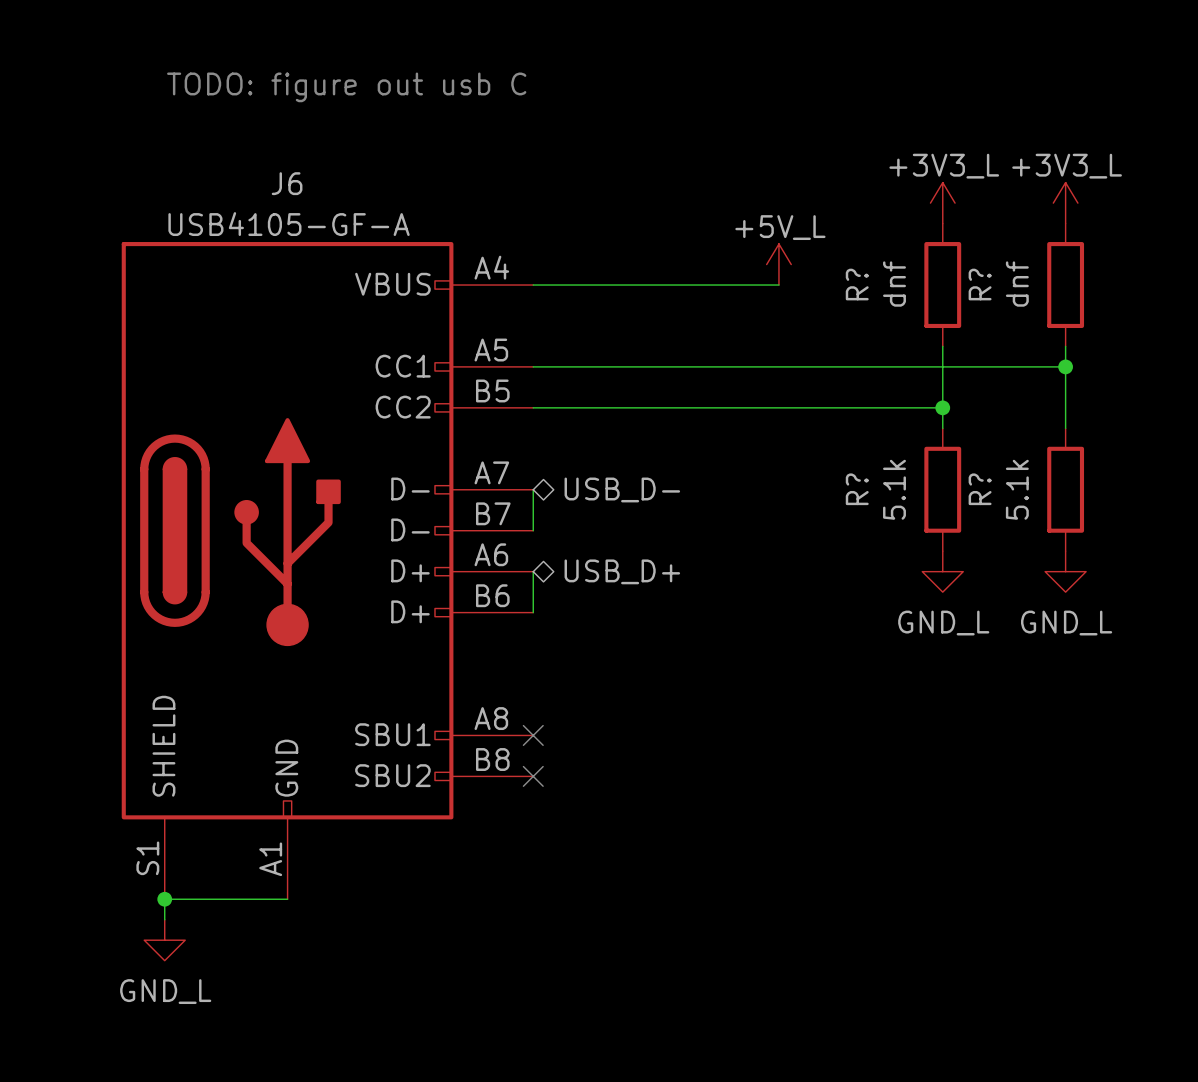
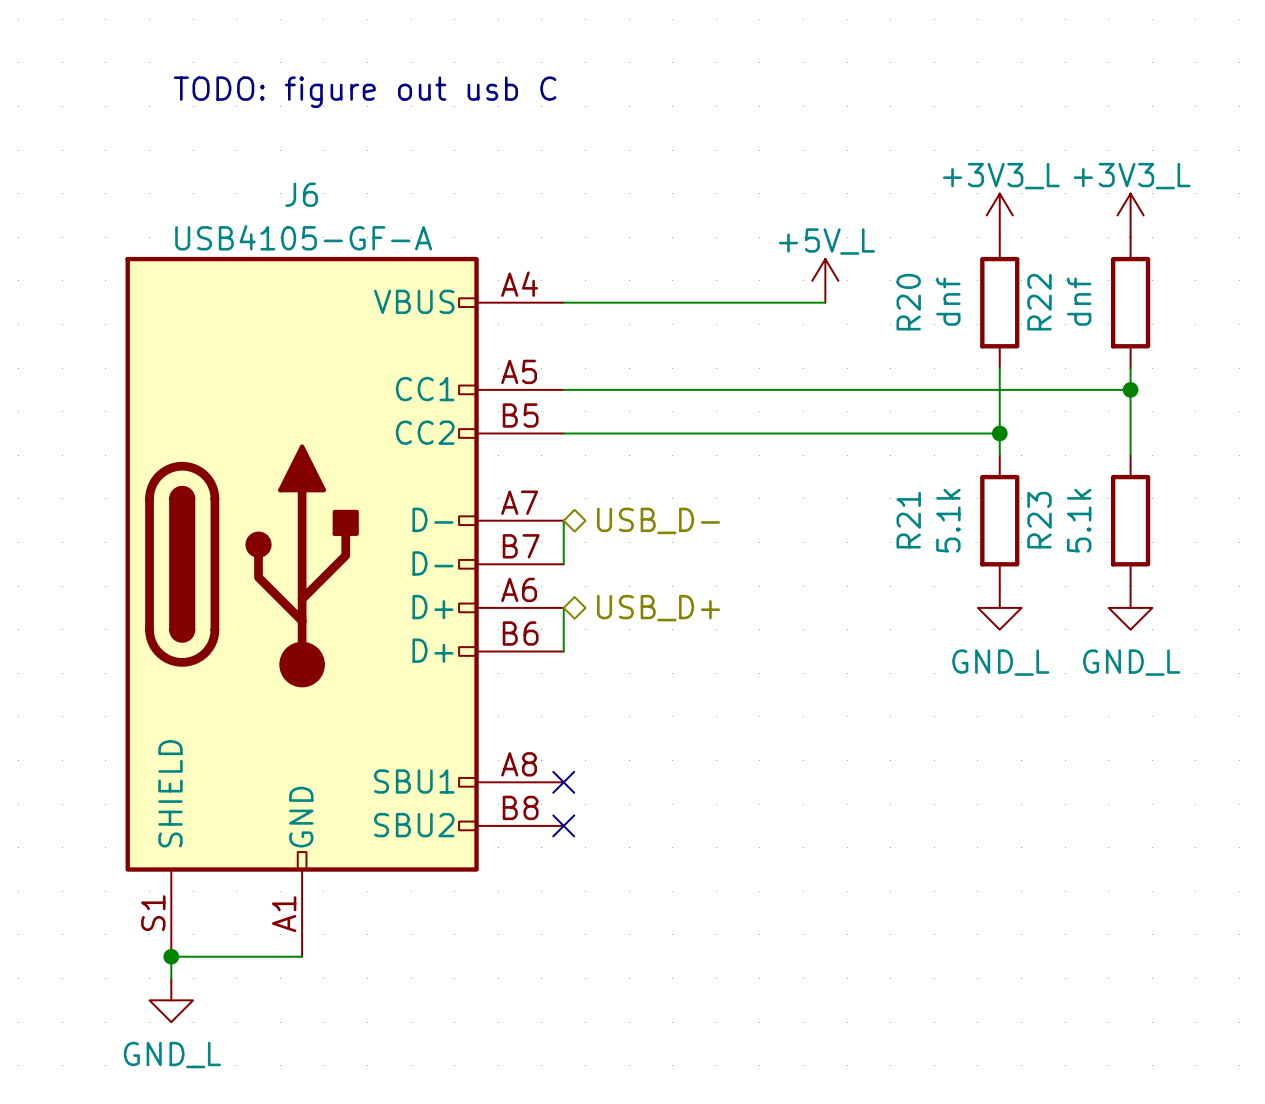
R? name: R? (857, 284) -> R20 (908, 302)
R? name: R? (980, 284) -> R22 (1039, 302)
R? name: R? (857, 489) -> R21 (908, 520)
R? name: R? (980, 489) -> R23 (1039, 520)

